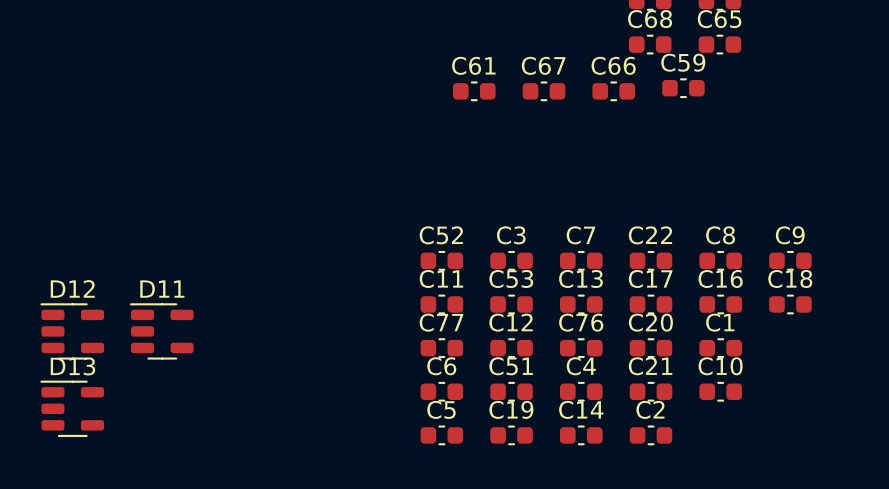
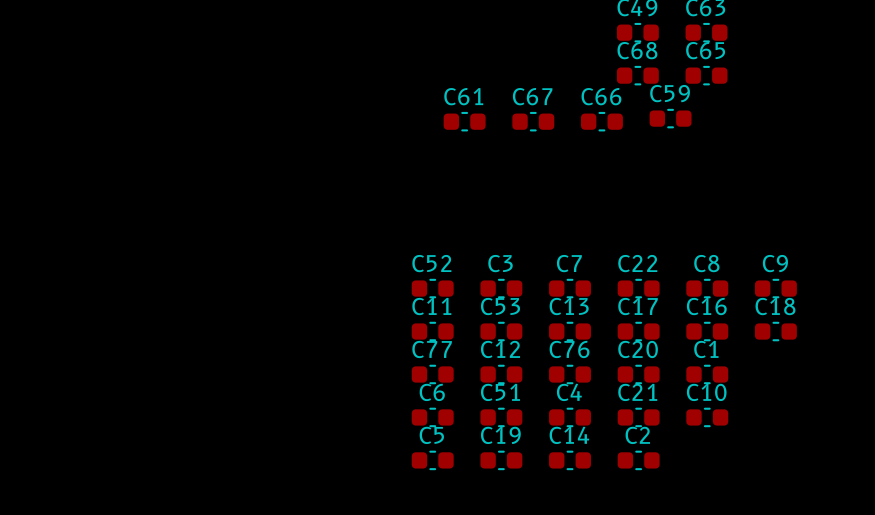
D12: (72, 331) -> none
D11: (161, 331) -> none
D13: (72, 408) -> none

